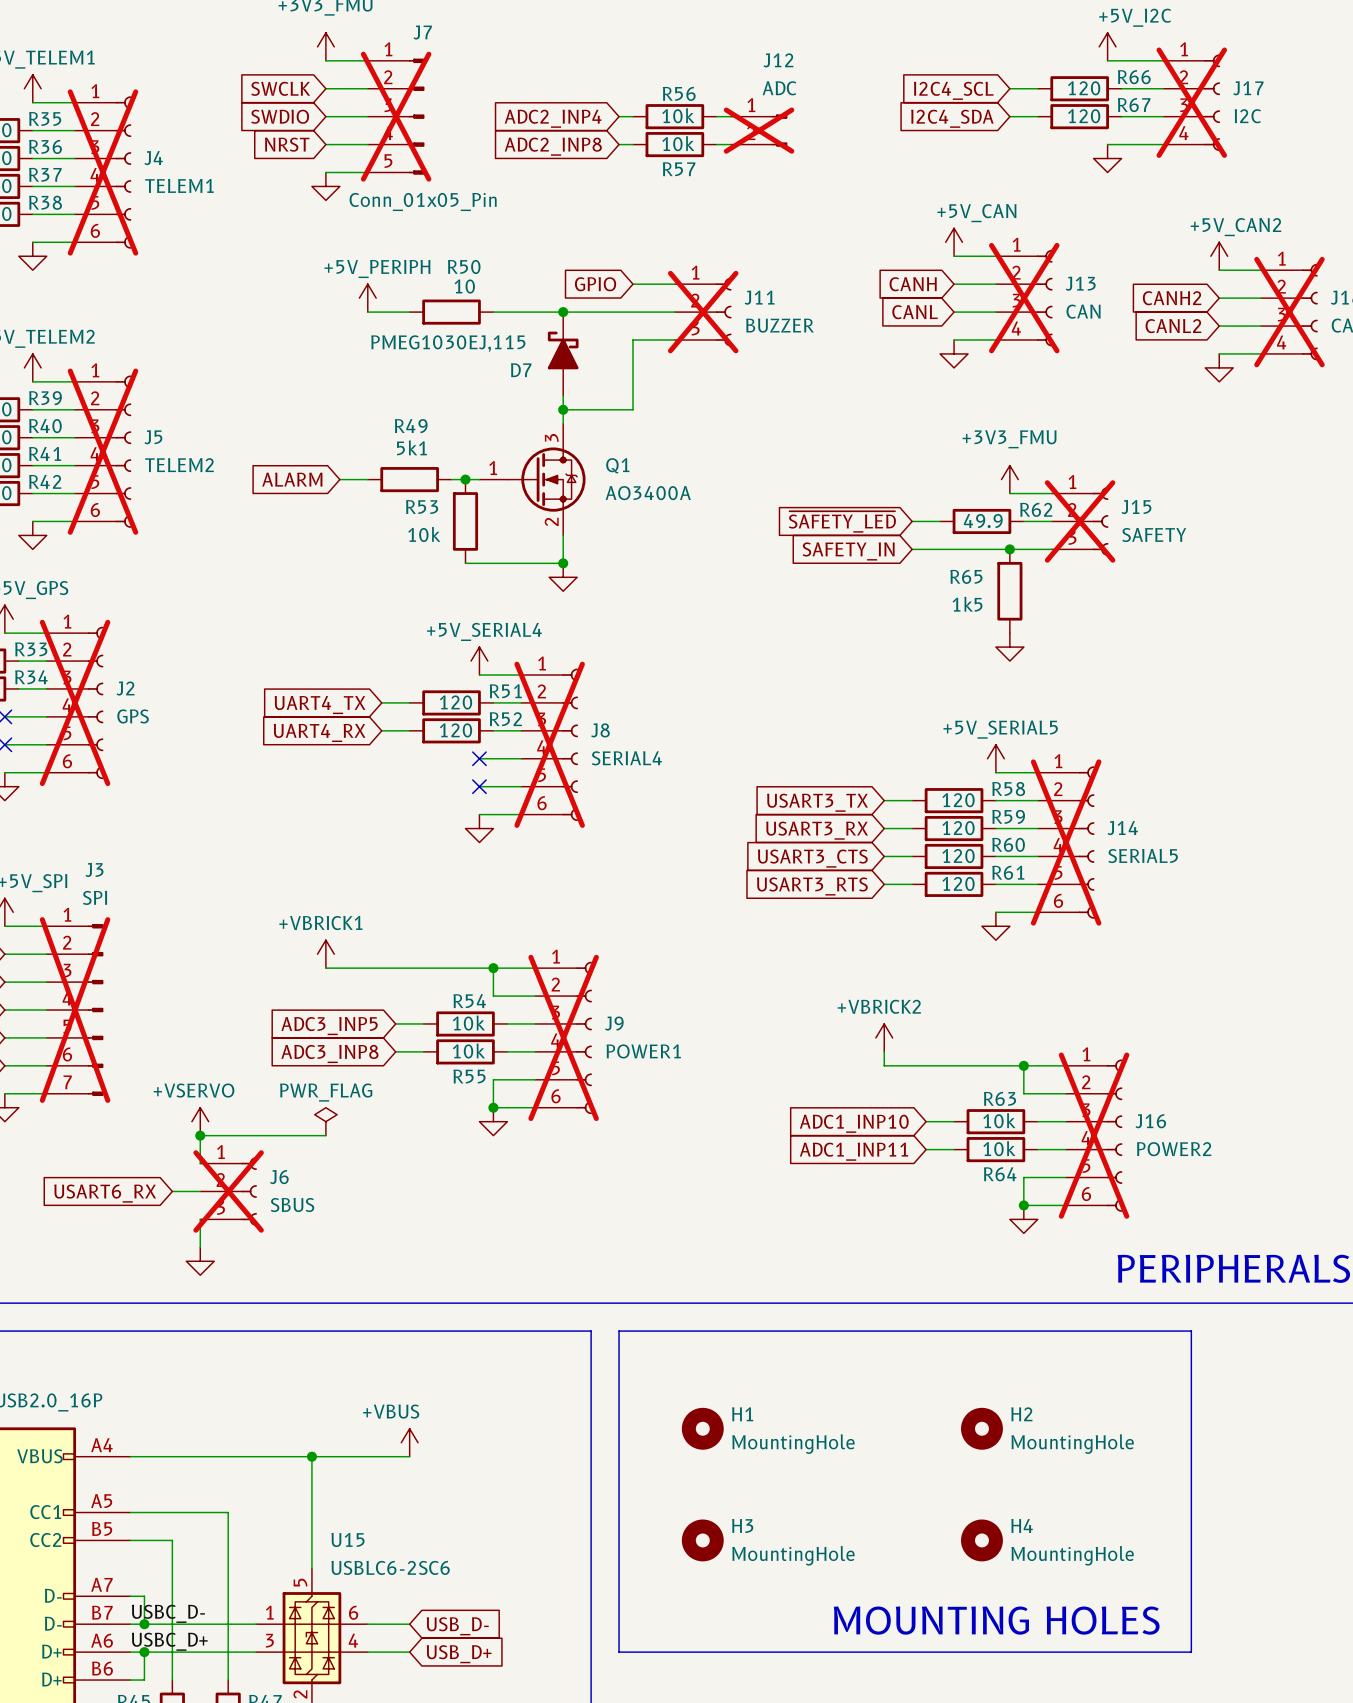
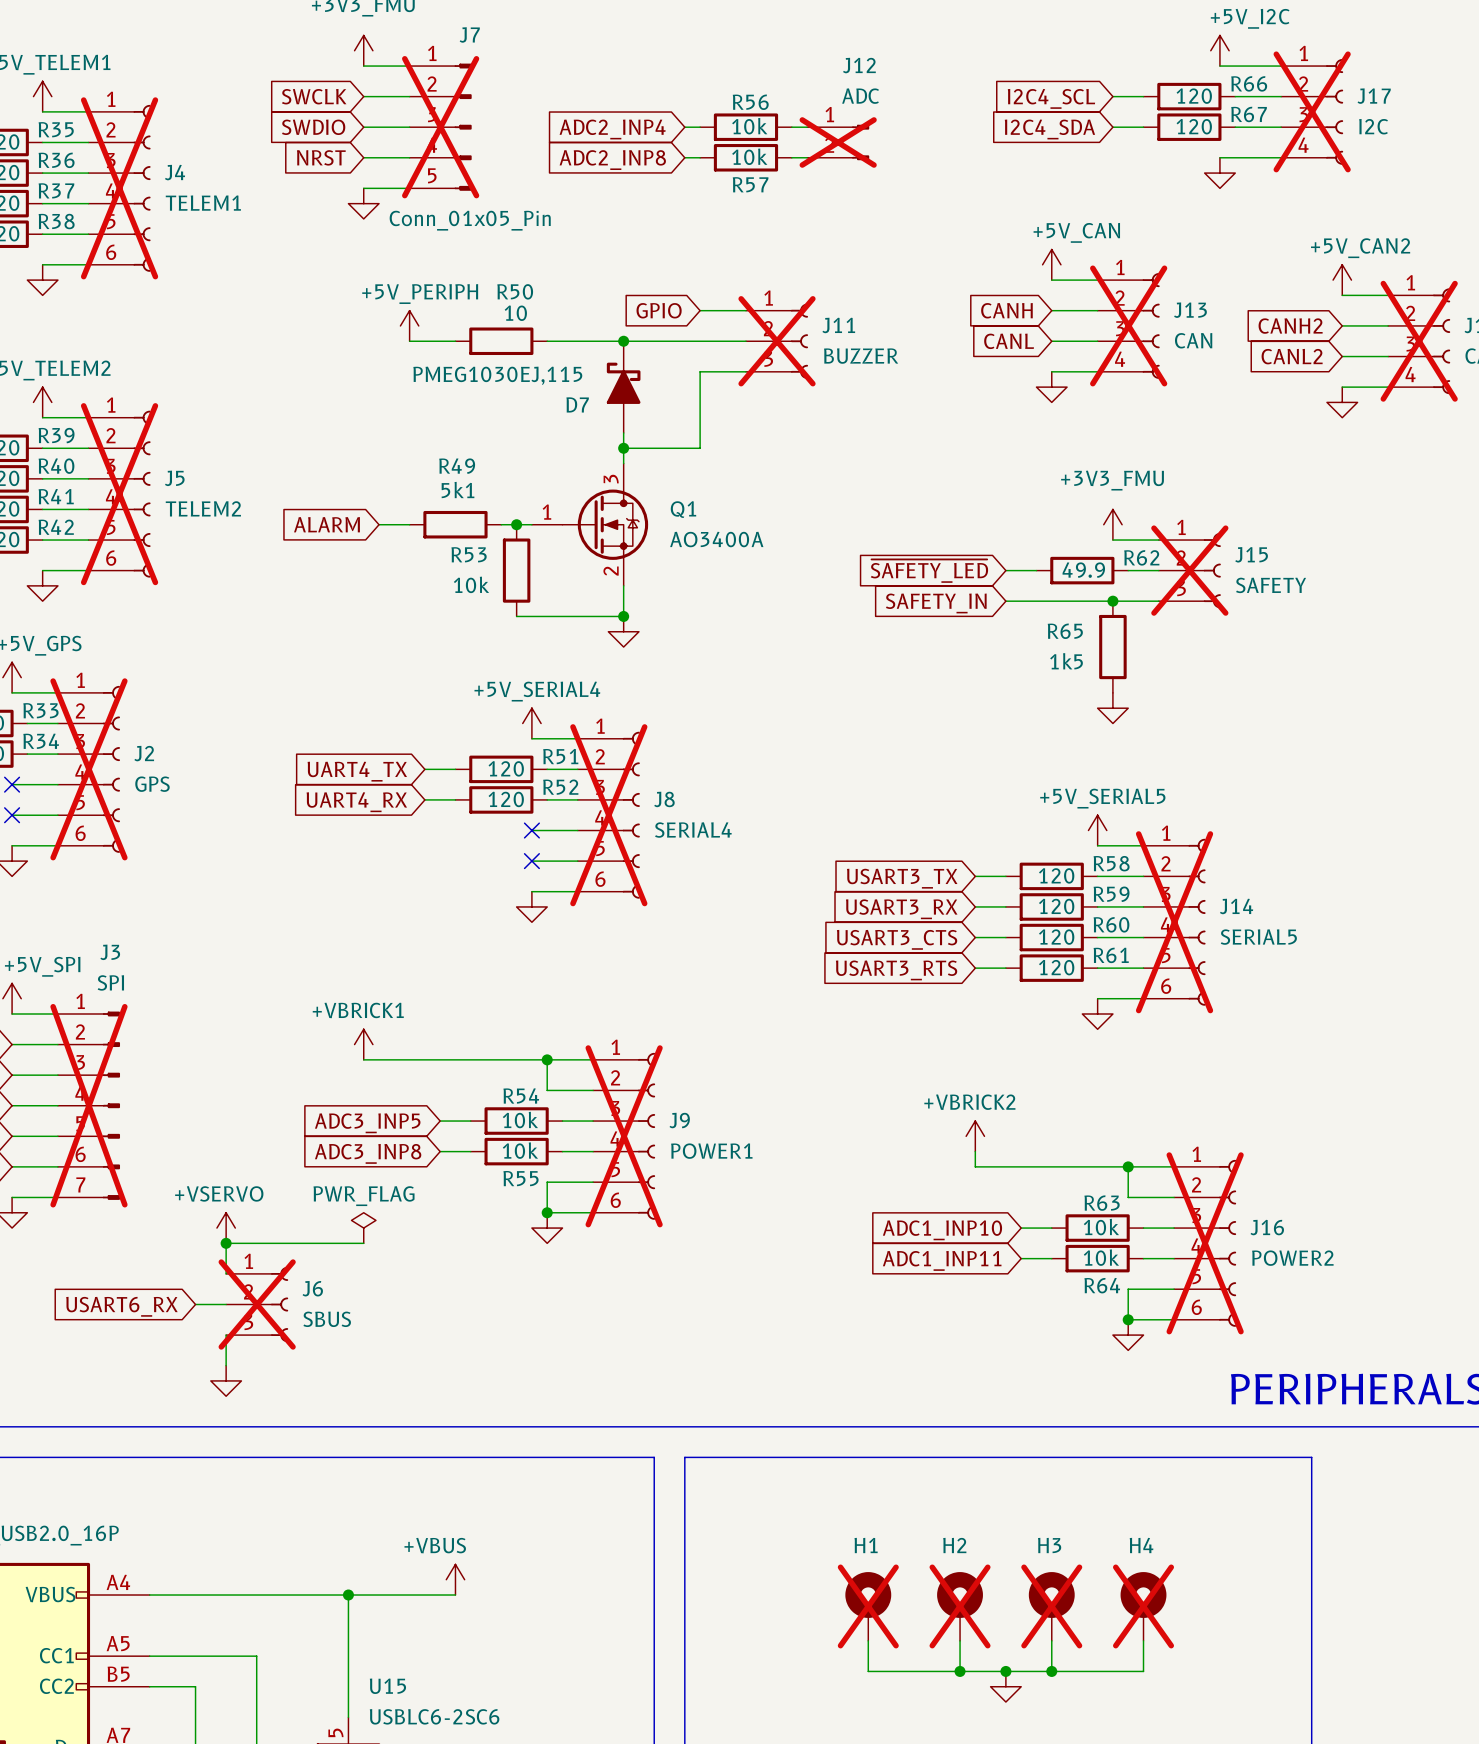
H1 symbol: [681, 1407, 724, 1450] -> [845, 1572, 892, 1641]
H2 symbol: [961, 1407, 1003, 1450] -> [937, 1572, 983, 1641]
H1 name position: H1 (742, 1414) -> H1 (866, 1545)
H2 name position: H2 (1021, 1414) -> H2 (954, 1545)
H1 value: MountingHole (793, 1444) -> none
H2 value: MountingHole (1072, 1444) -> none
H1 do-not-place cross: none -> (868, 1606)
H2 do-not-place cross: none -> (960, 1606)
H3 do-not-place cross: none -> (1051, 1606)
H4 do-not-place cross: none -> (1143, 1606)
wire: none -> (868, 1640) (868, 1671) (1143, 1671) (1143, 1640)
wire: none -> (960, 1640) (960, 1671)
wire: none -> (1051, 1640) (1051, 1671)
H3 symbol: [681, 1519, 724, 1562] -> [1028, 1572, 1075, 1641]
H4 symbol: [961, 1519, 1003, 1562] -> [1120, 1572, 1167, 1641]
H3 name position: H3 (742, 1525) -> H3 (1049, 1545)
H4 name position: H4 (1022, 1525) -> H4 (1141, 1545)
junction: none -> (960, 1671)
junction: none -> (1005, 1671)
junction: none -> (1051, 1671)
power symbol: none -> (1005, 1686)
H3 value: MountingHole (793, 1555) -> none
H4 value: MountingHole (1072, 1555) -> none

